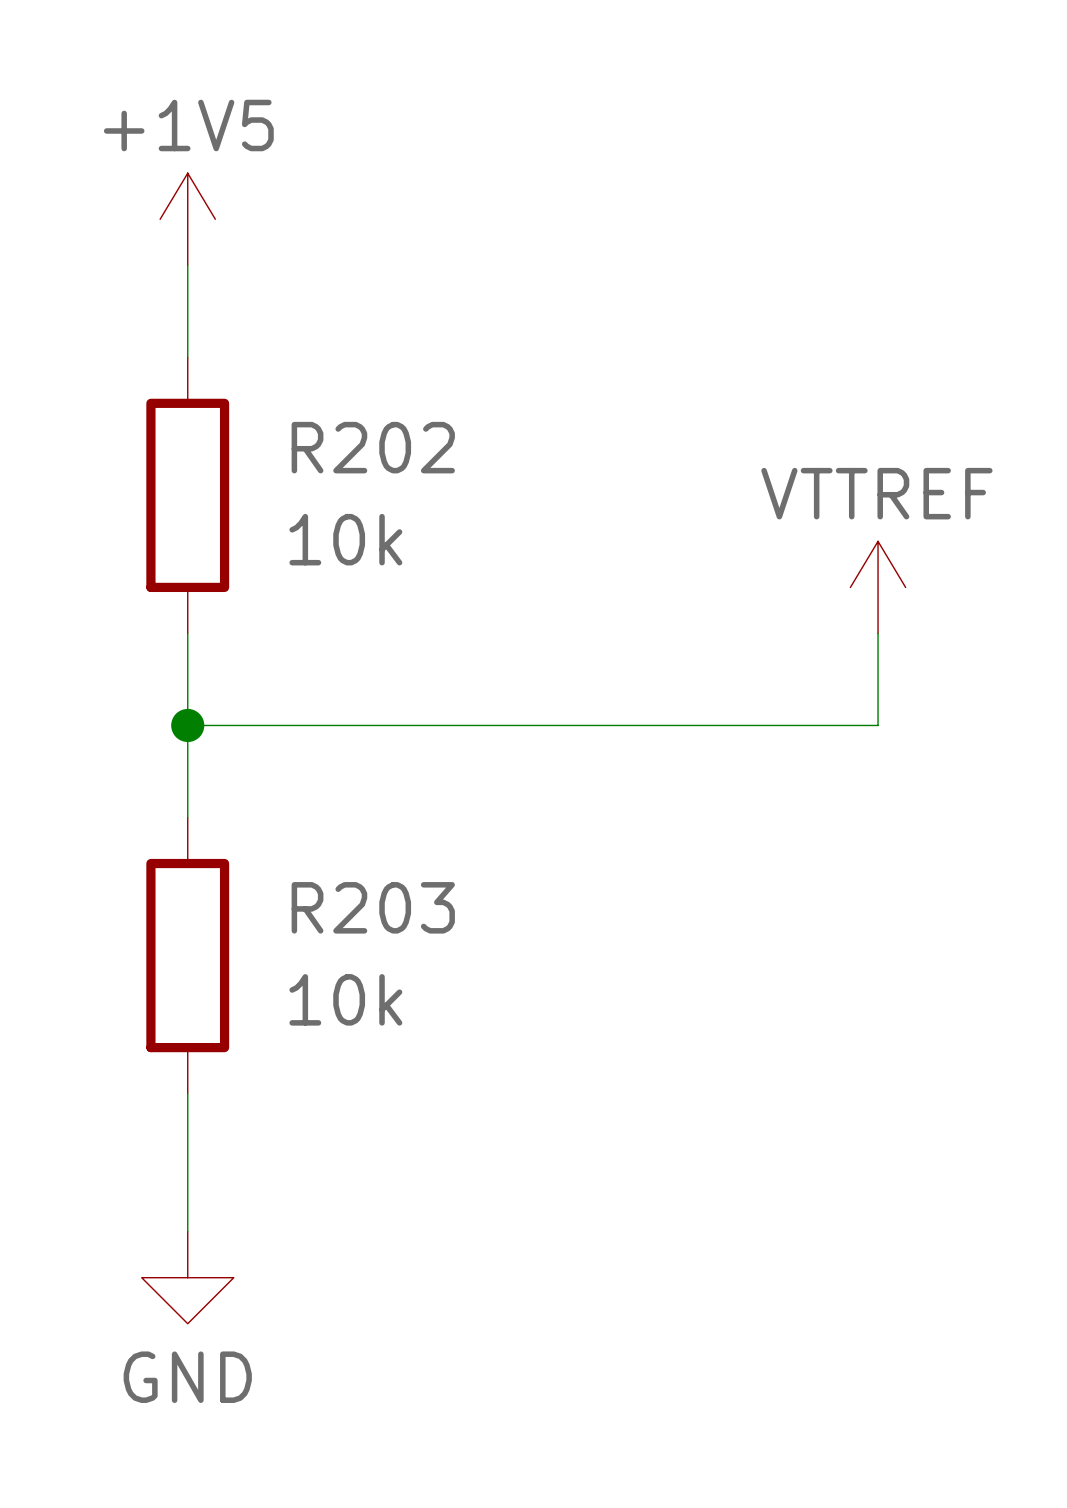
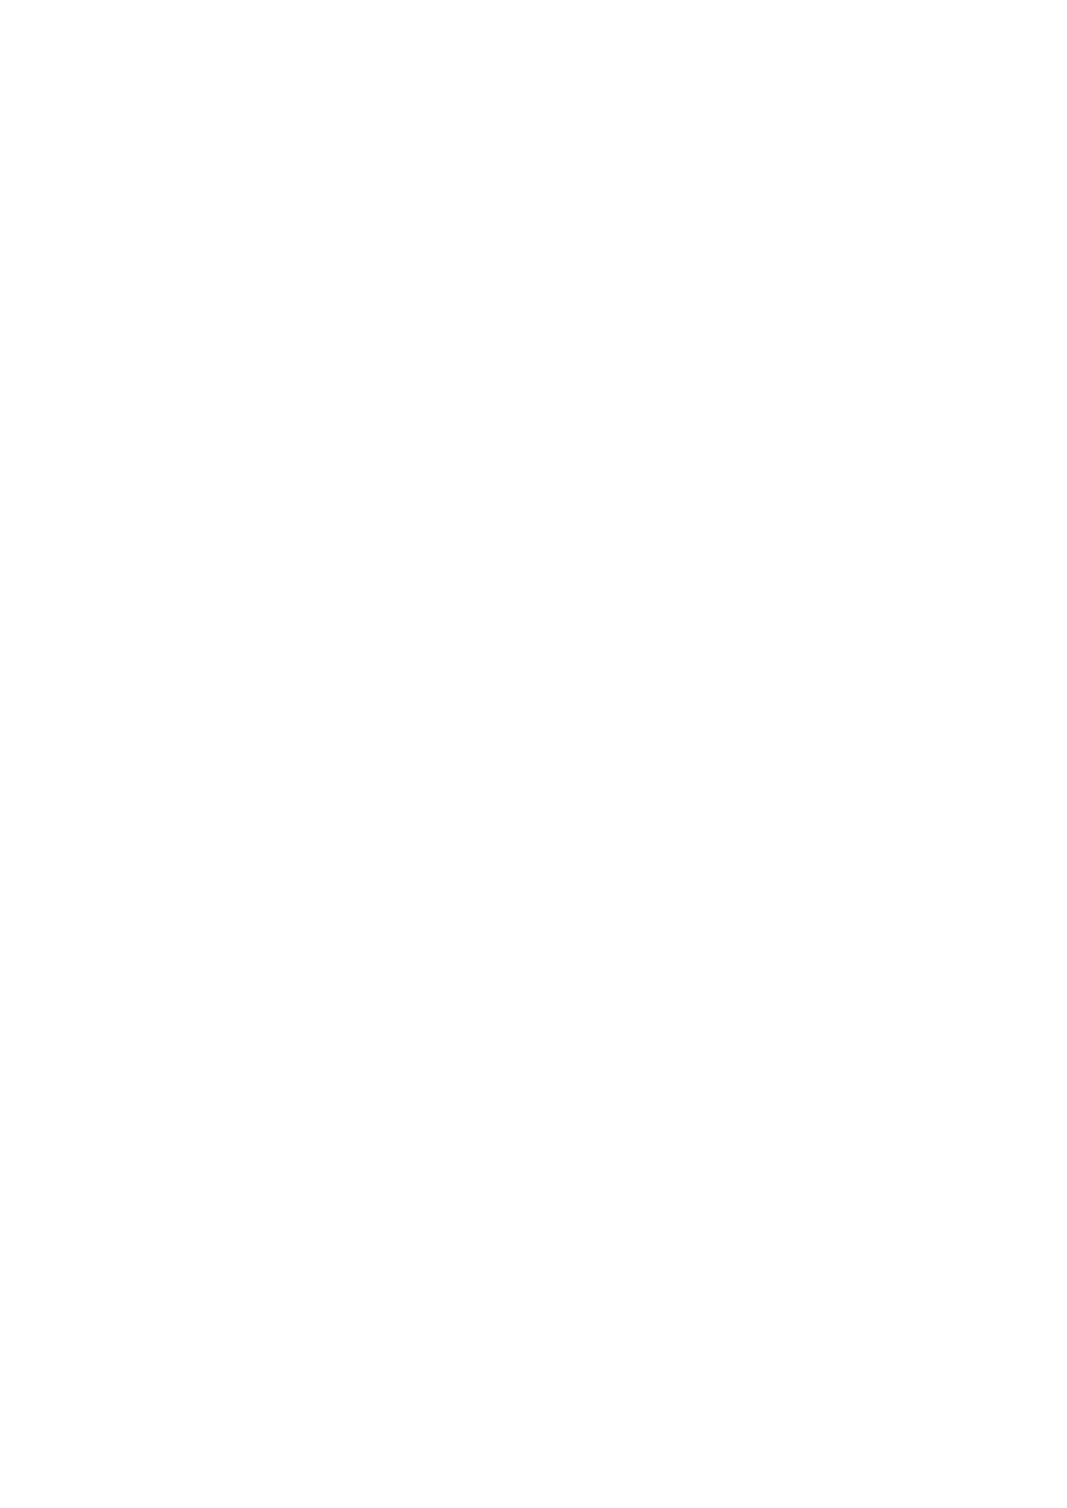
power symbol: +1V5 (187, 219) -> none
wire: (187, 265) (187, 357) -> none
R202: 10k (187, 495) -> none
power symbol: VTTREF (878, 587) -> none
wire: (187, 633) (187, 817) -> none
wire: (878, 633) (878, 725) (187, 725) -> none
junction: (187, 725) -> none
R203: 10k (187, 955) -> none
wire: (187, 1093) (187, 1231) -> none
power symbol: GND (187, 1277) -> none

